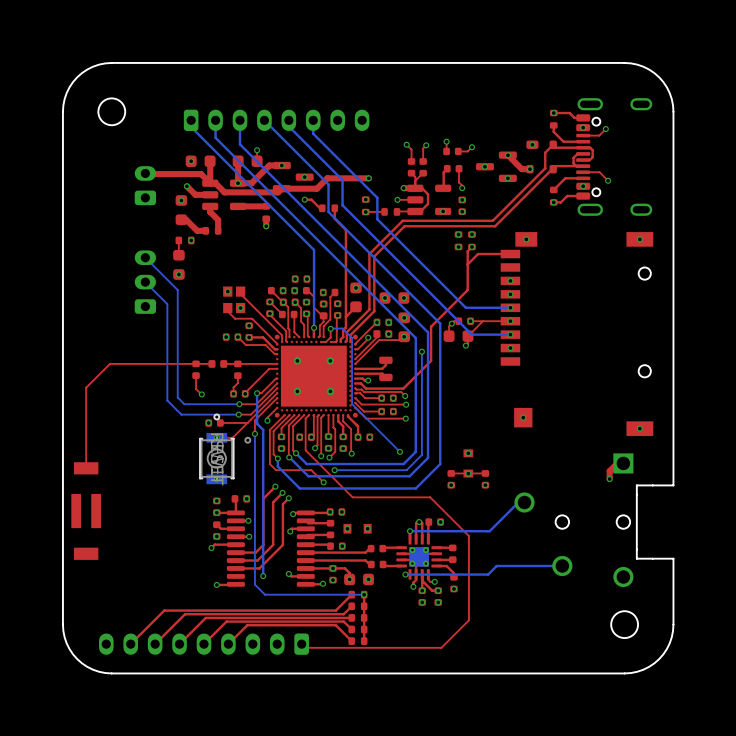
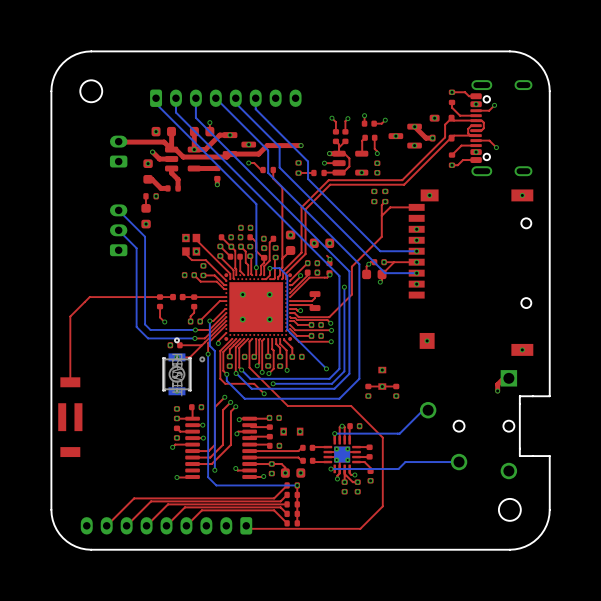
part footprint: [398, 312, 411, 343] -> [326, 260, 333, 276]
top track: none -> (326, 255) (329, 258) (329, 263)

